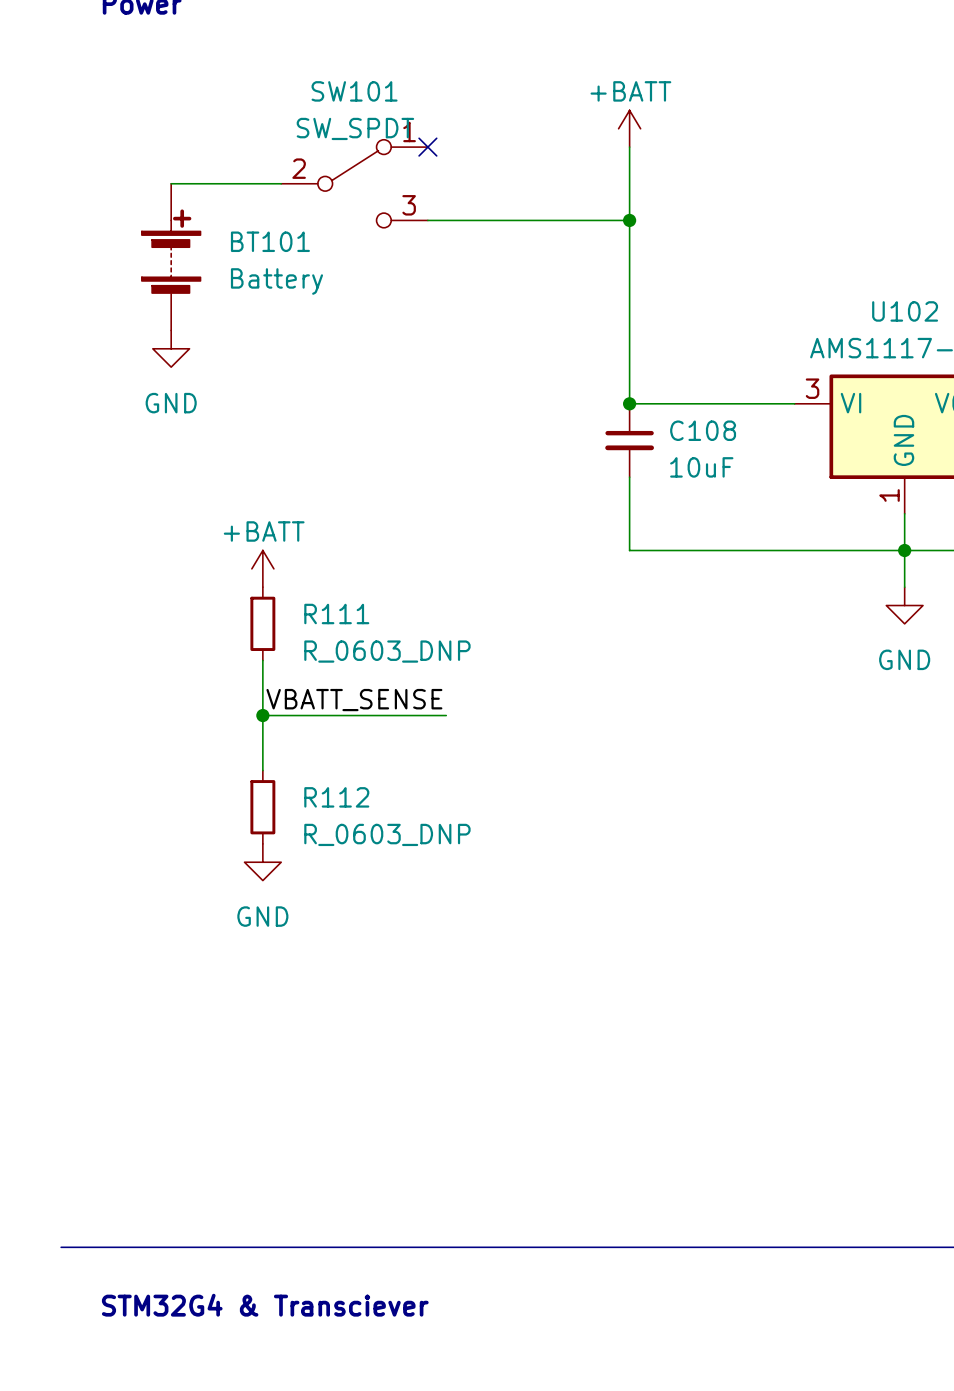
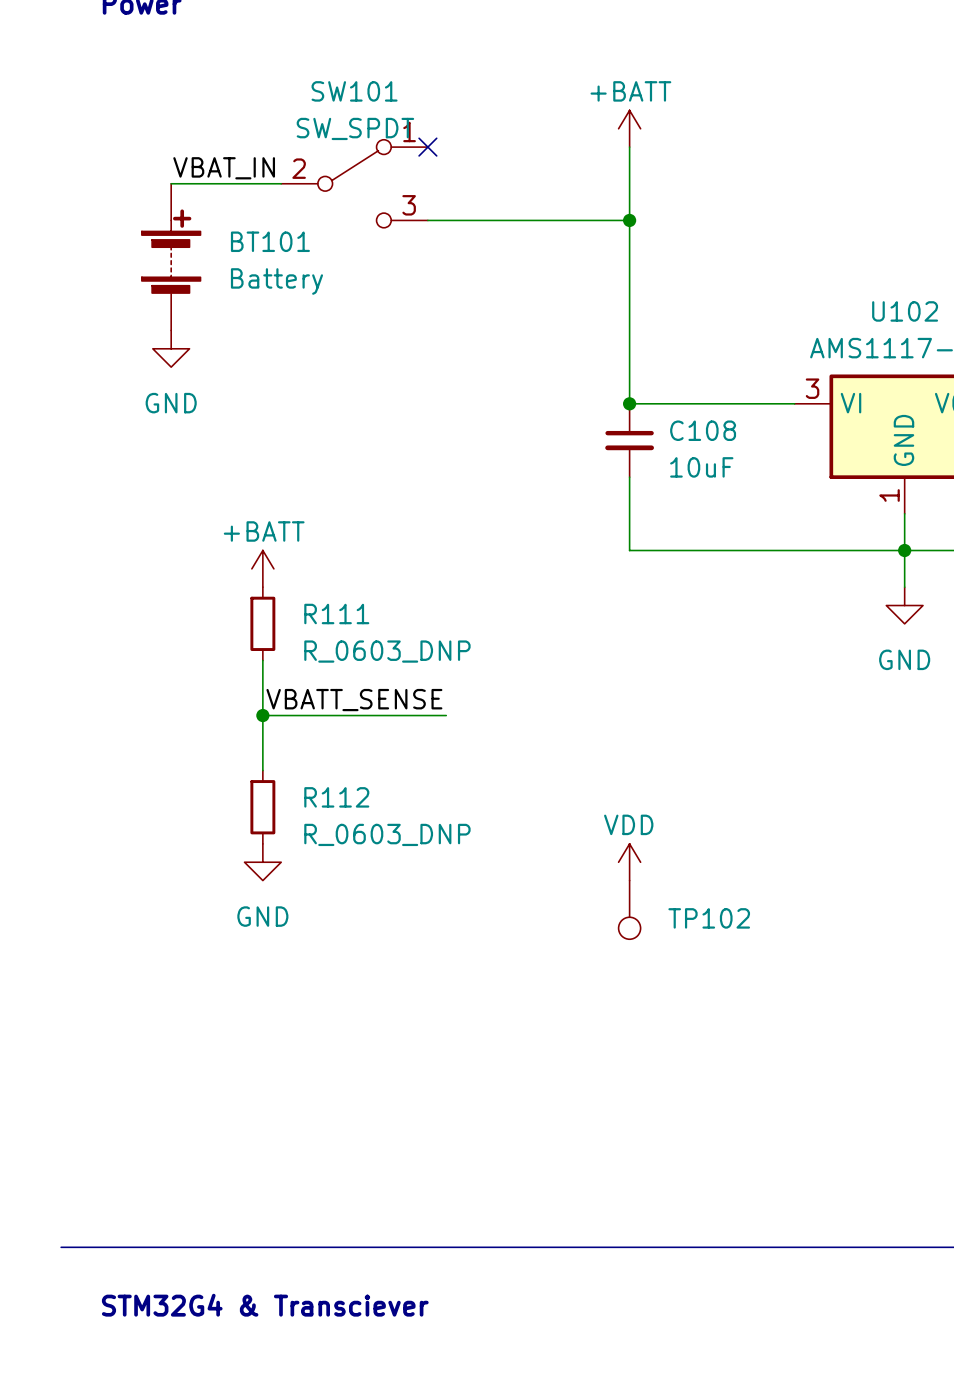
label: none -> VBAT_IN (224, 168)
power symbol: none -> VDD (629, 862)
TP102: none -> (629, 909)

